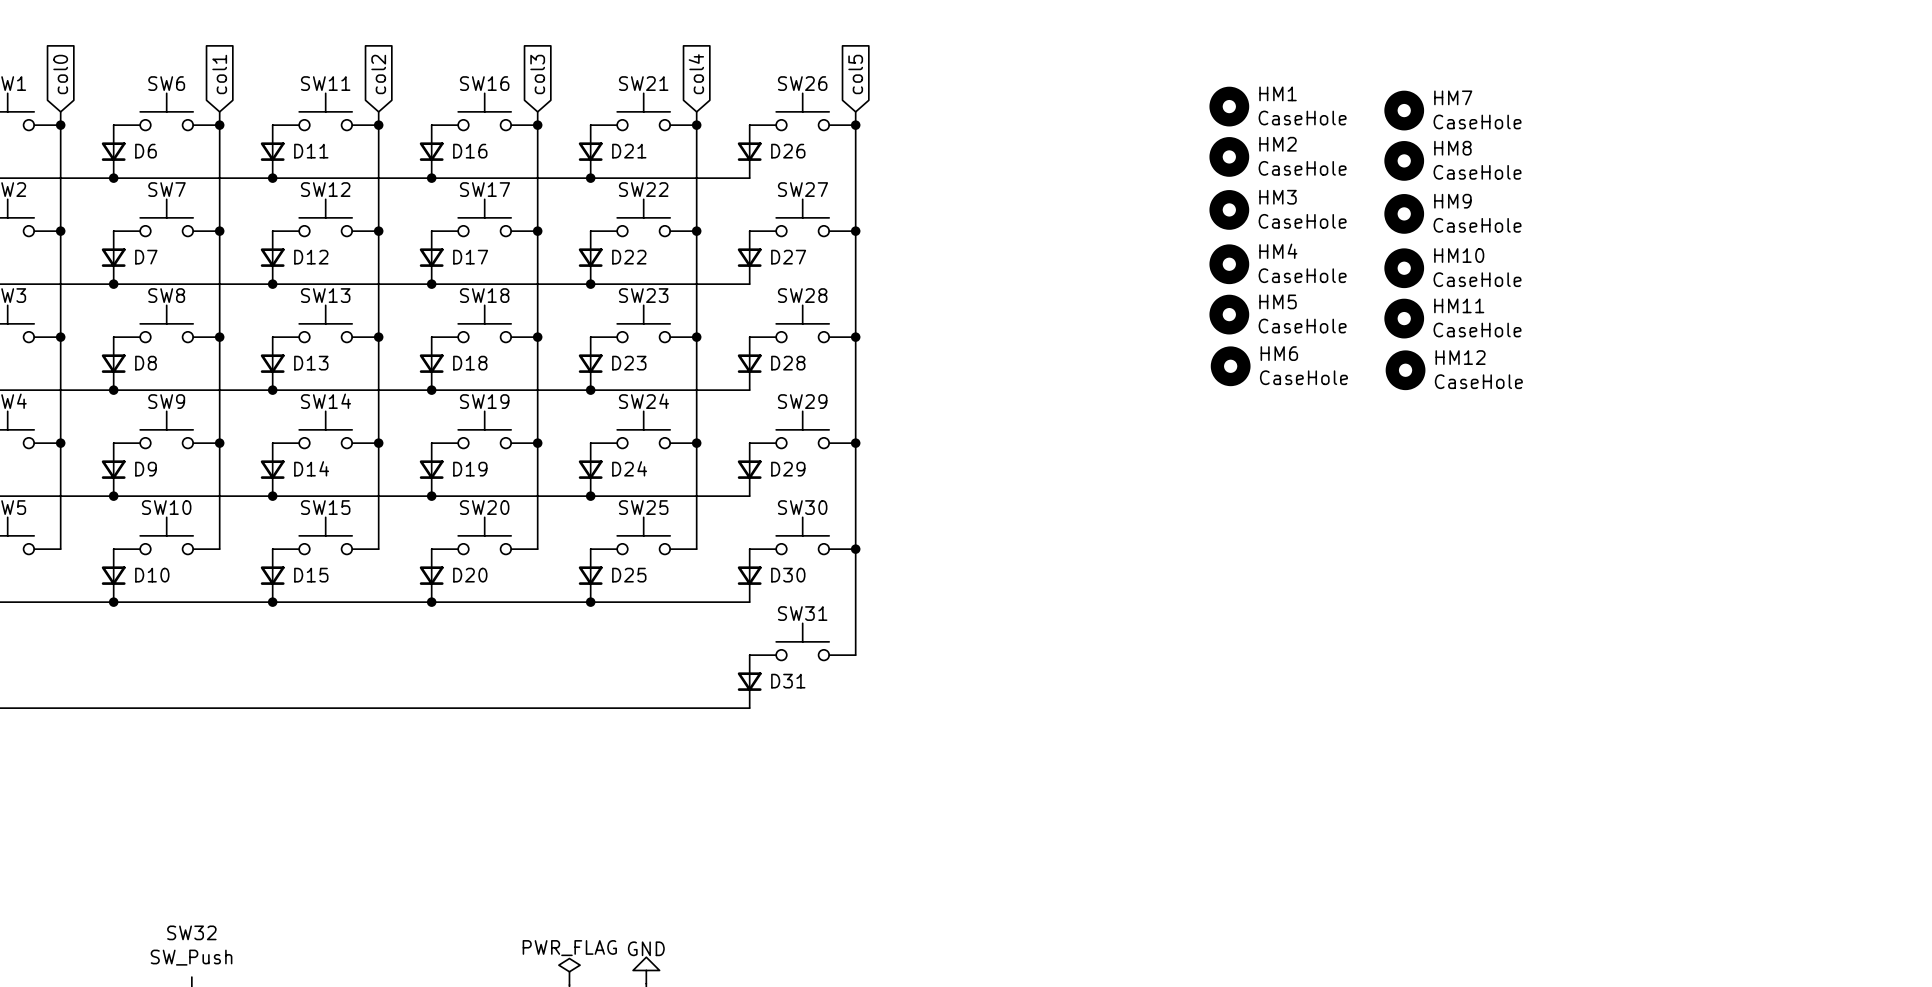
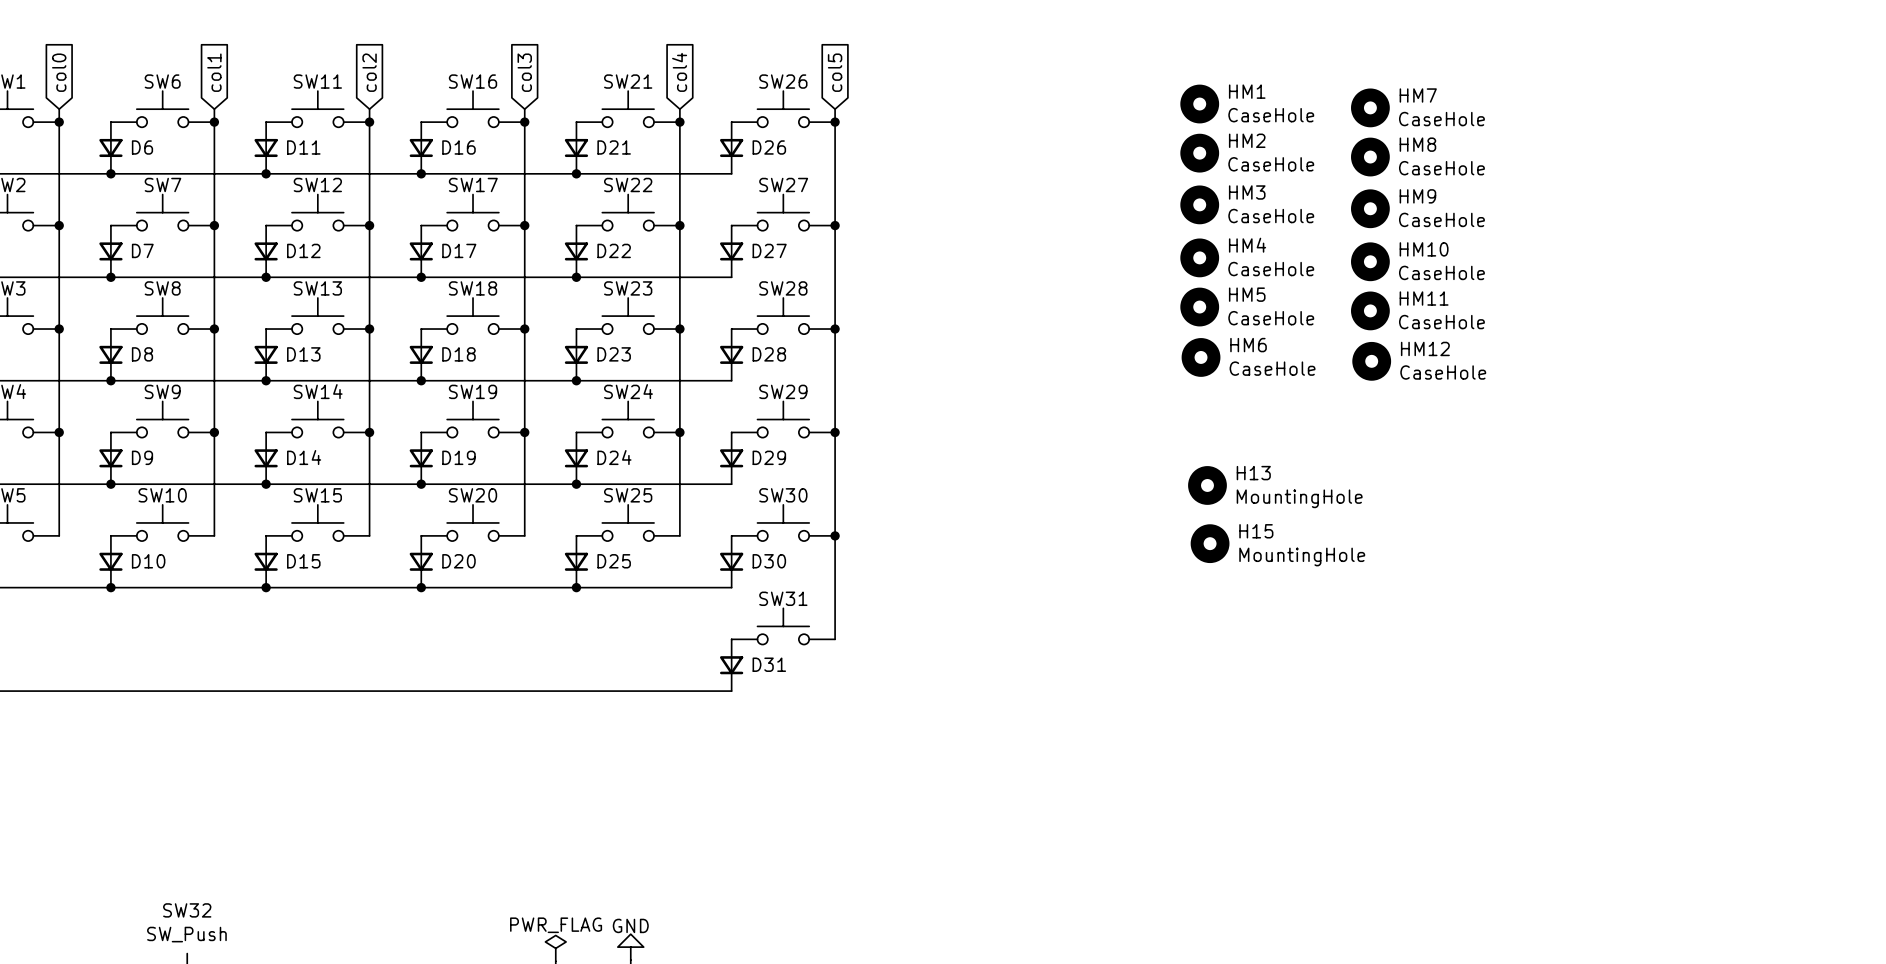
H13: none -> MountingHole (1207, 485)
H15: none -> MountingHole (1210, 543)

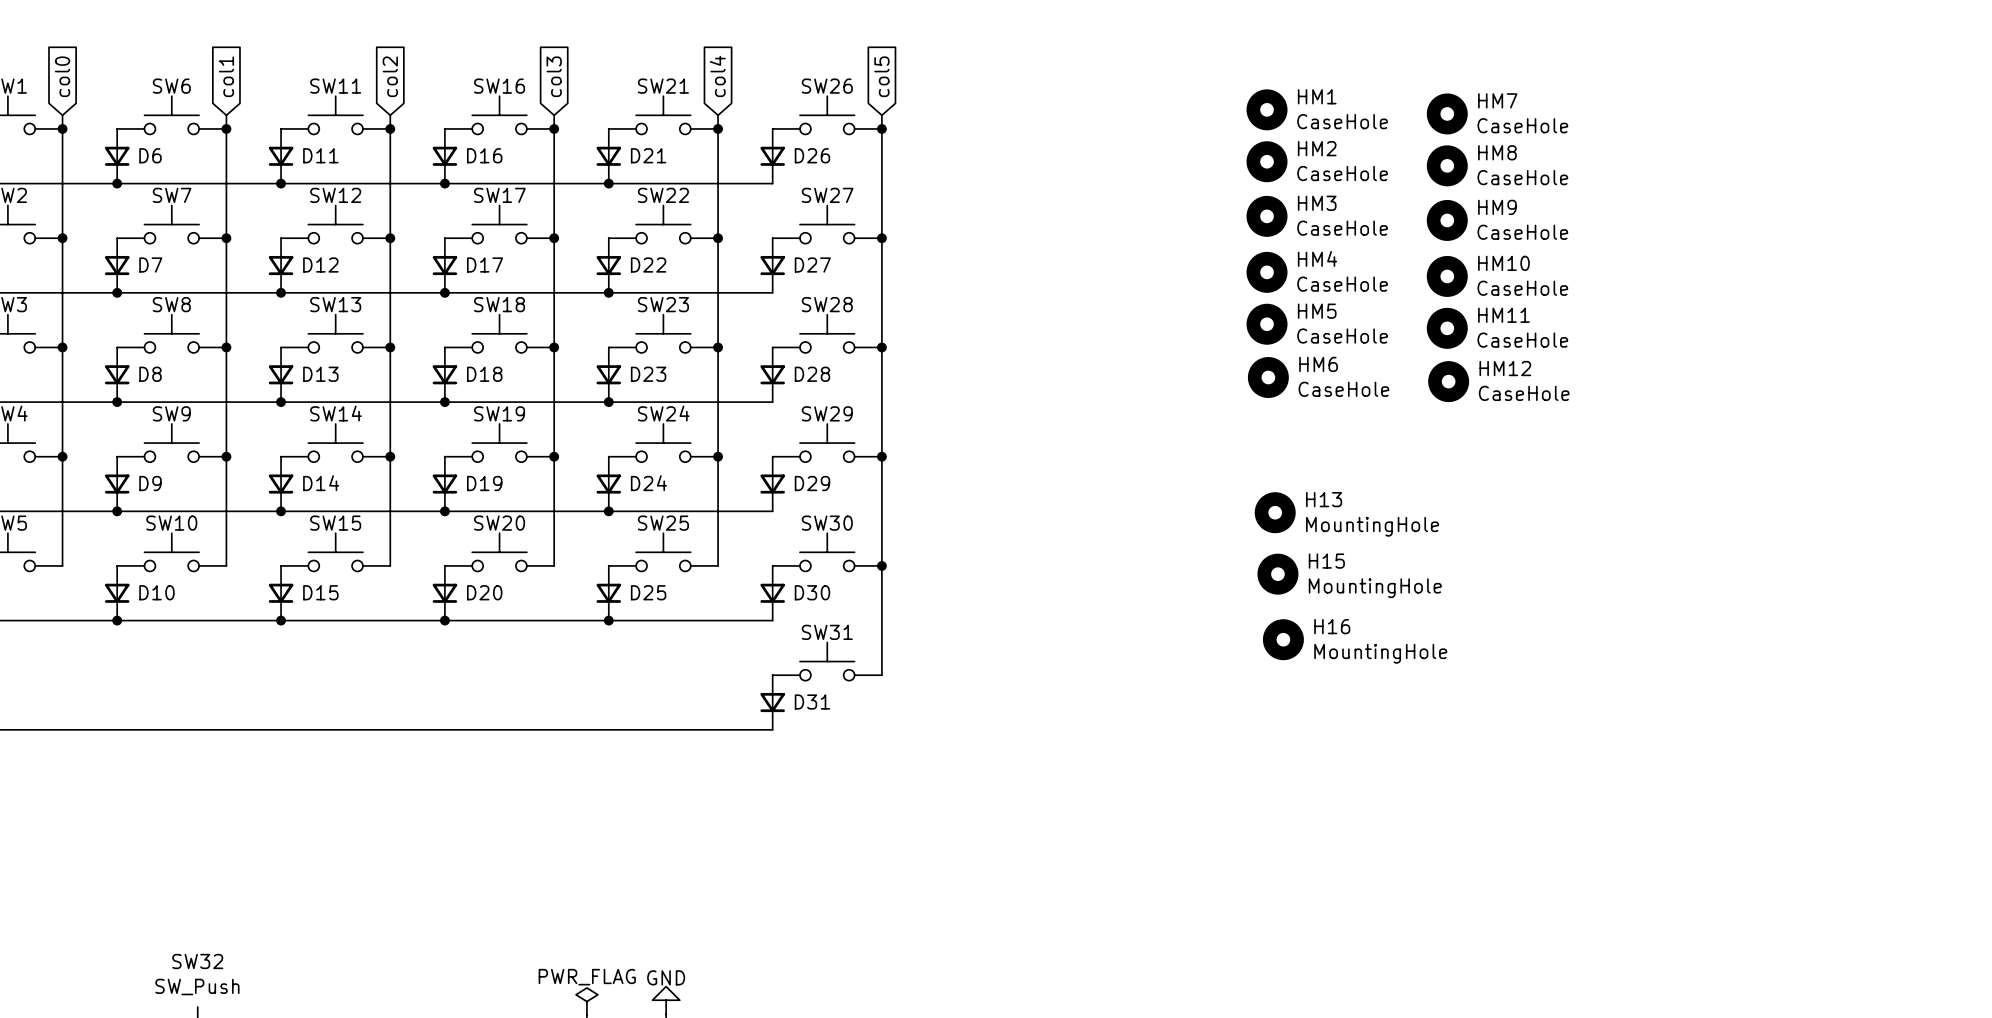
H16: none -> MountingHole (1283, 639)

